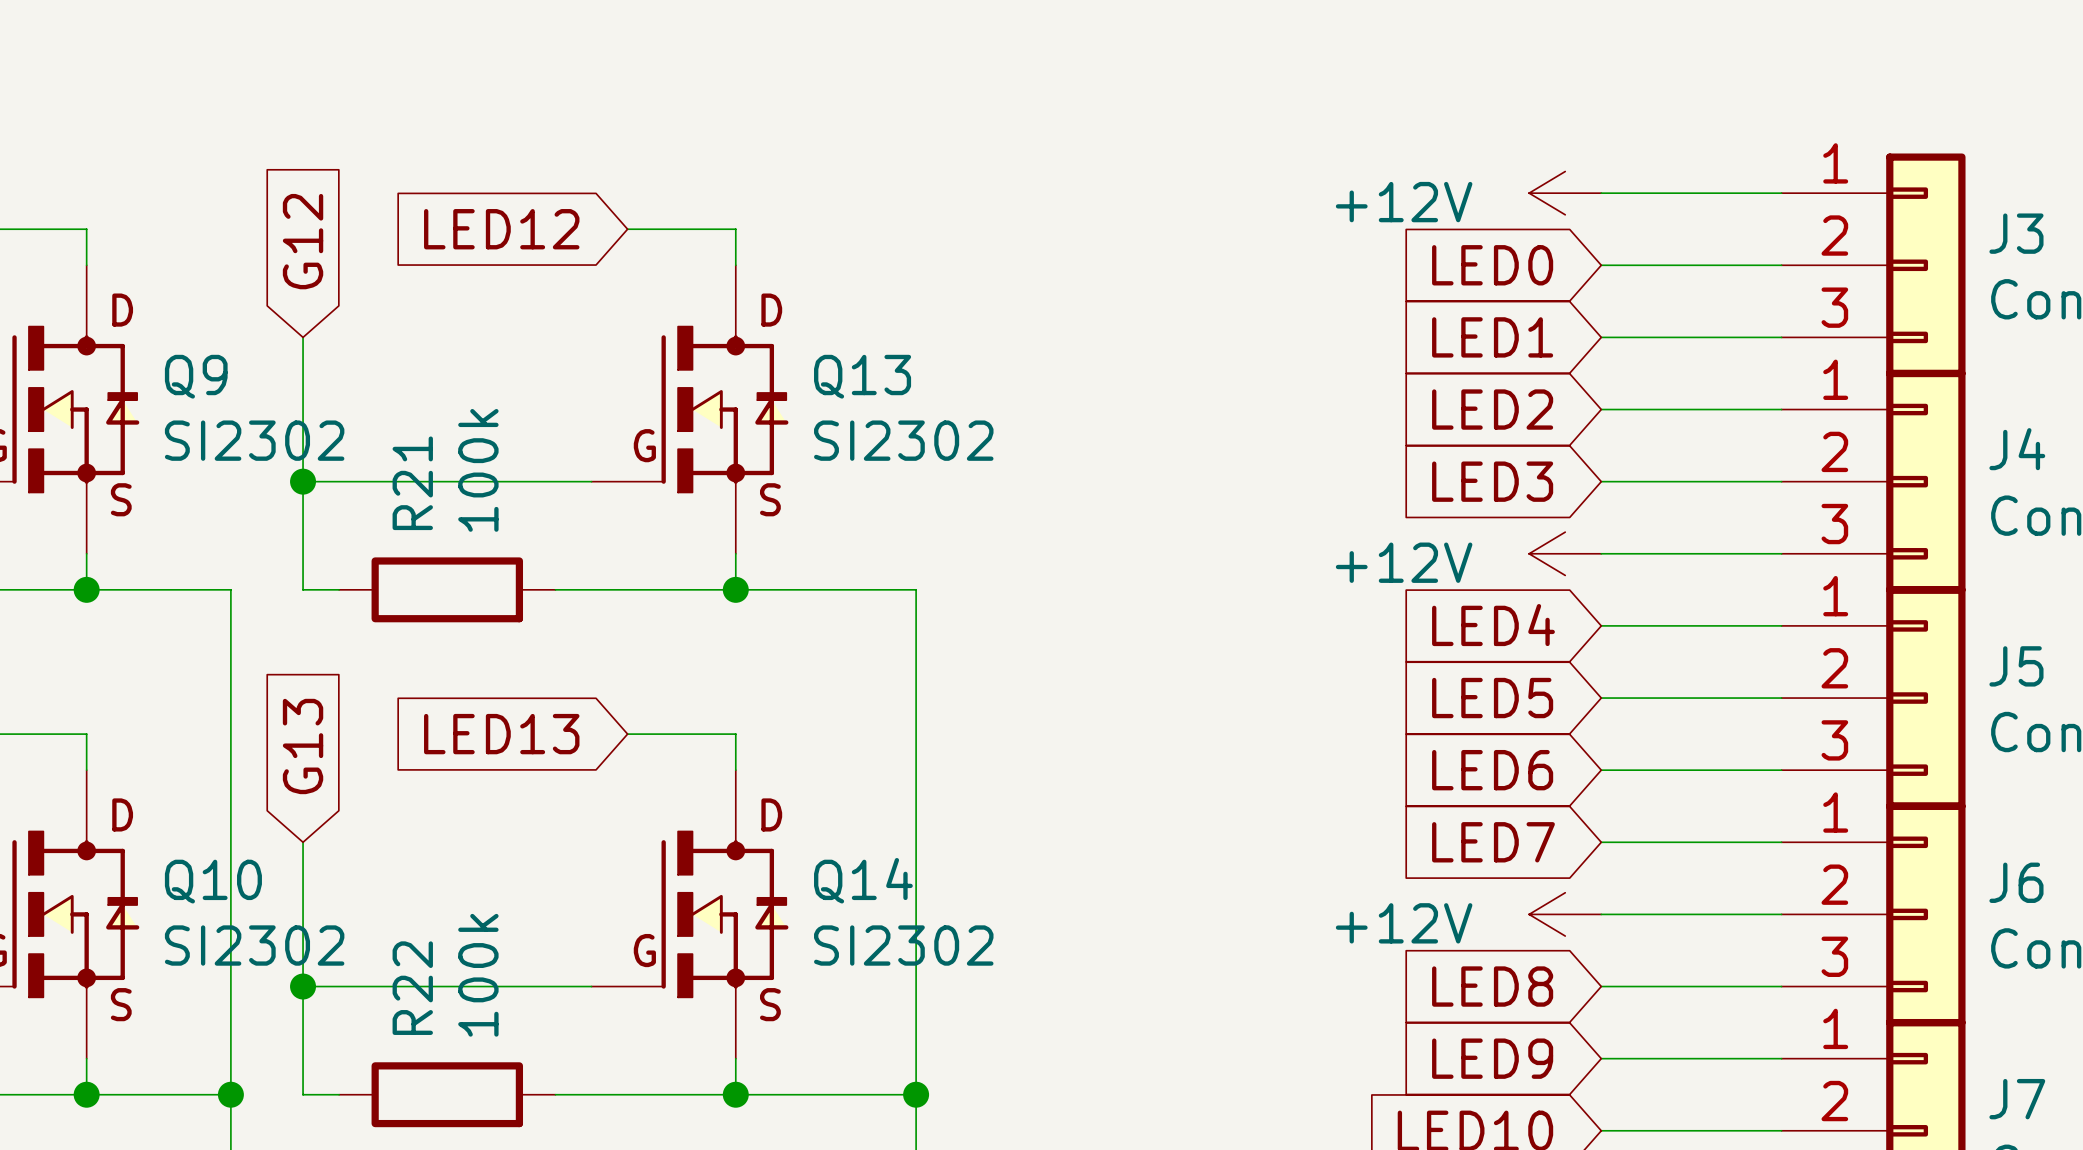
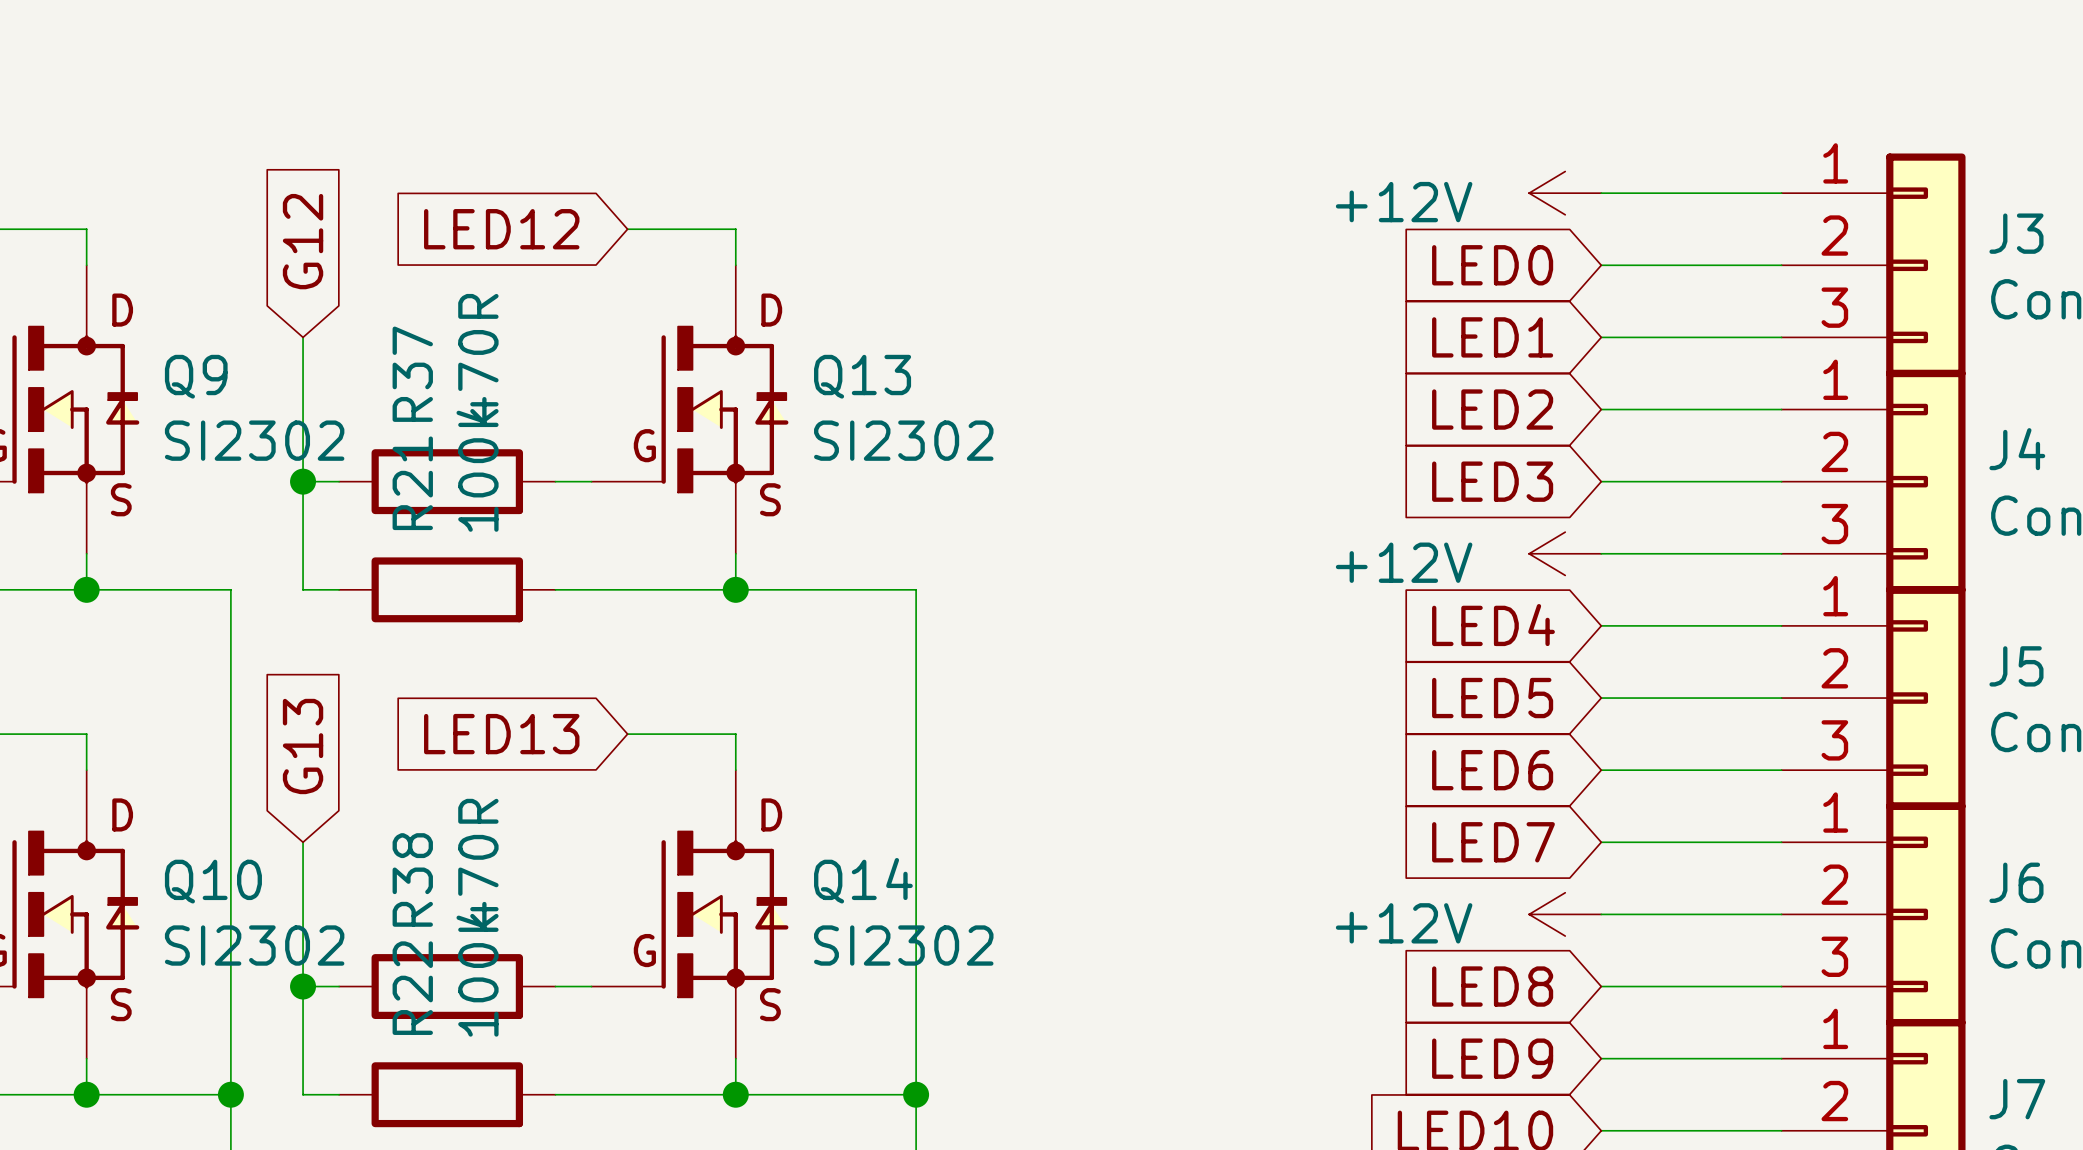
wire: (339, 481) (555, 481) -> none
R37: none -> 470R (447, 481)
wire: (339, 986) (555, 986) -> none
R38: none -> 470R (447, 986)

